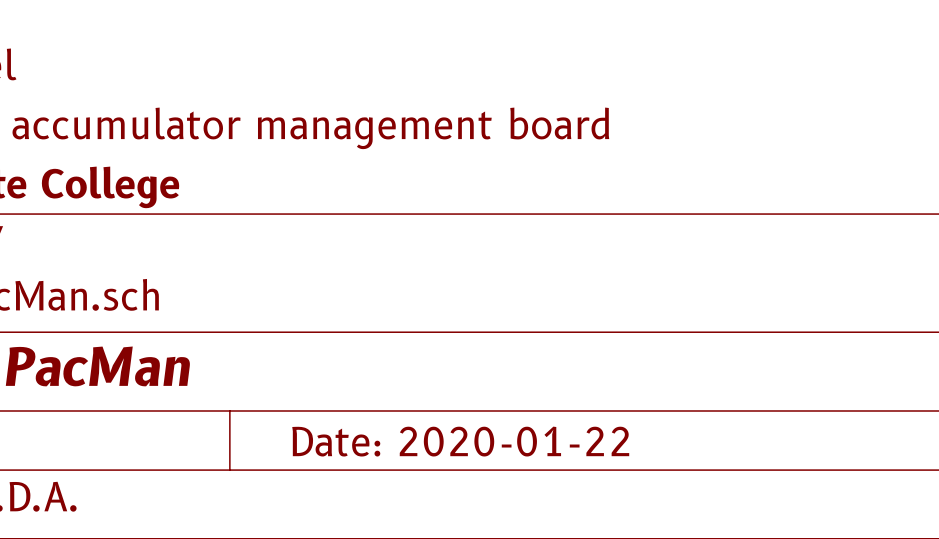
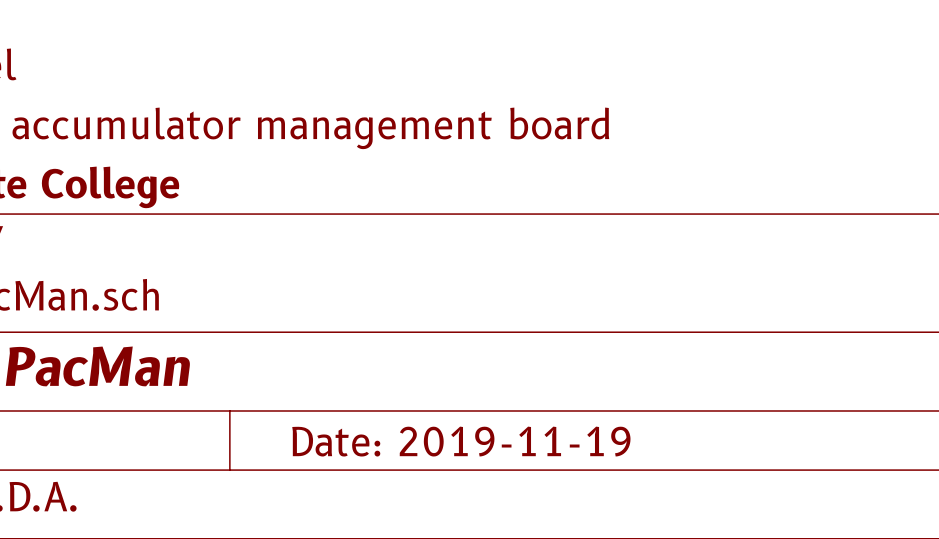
title block: Date: 2020-01-22 (460, 441) -> Date: 2019-11-19 (461, 441)

